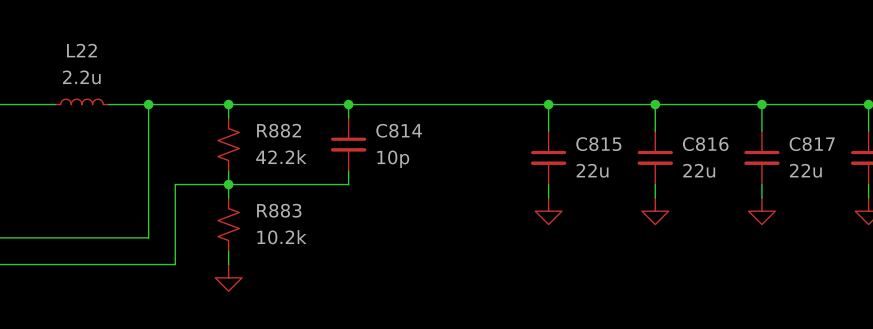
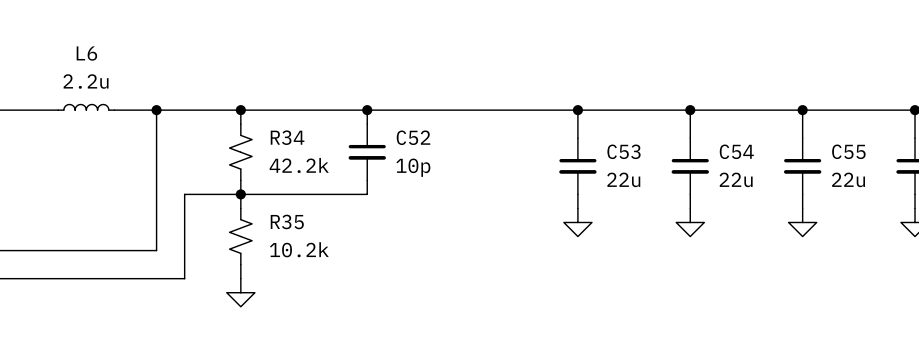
L22 name: L22 (81, 50) -> L6 (86, 53)
R882 name: R882 (279, 130) -> R34 (287, 137)
C814 name: C814 (399, 130) -> C52 (413, 137)
C815 name: C815 (598, 144) -> C53 (624, 151)
C816 name: C816 (705, 144) -> C54 (736, 151)
C817 name: C817 (812, 144) -> C55 (848, 151)
R883 name: R883 (279, 210) -> R35 (287, 221)

